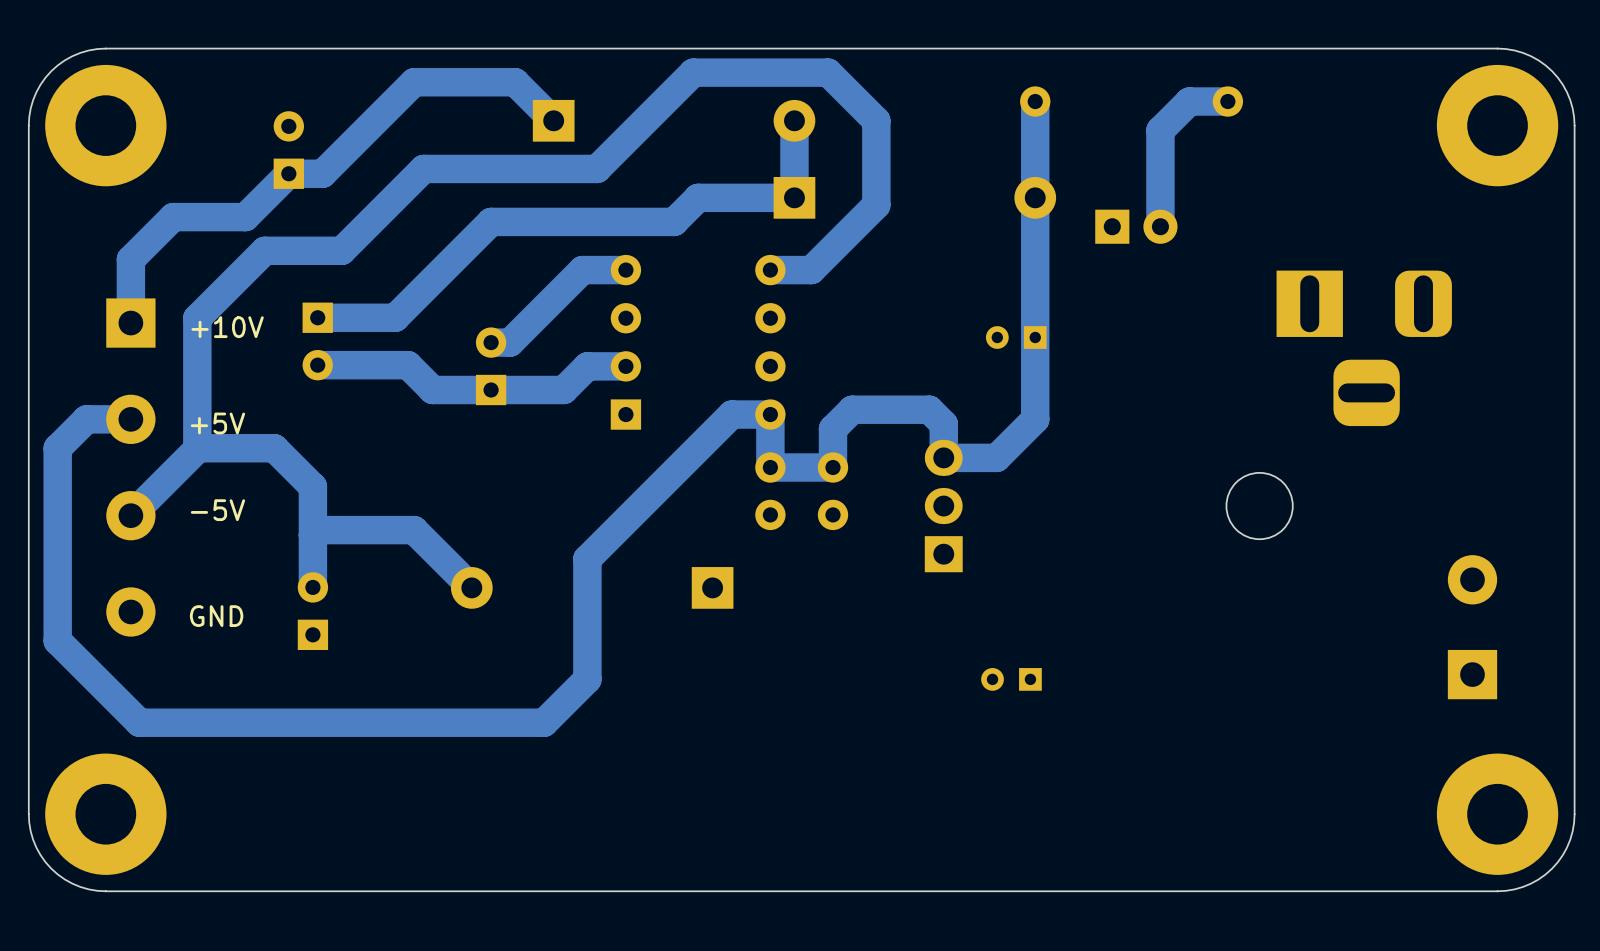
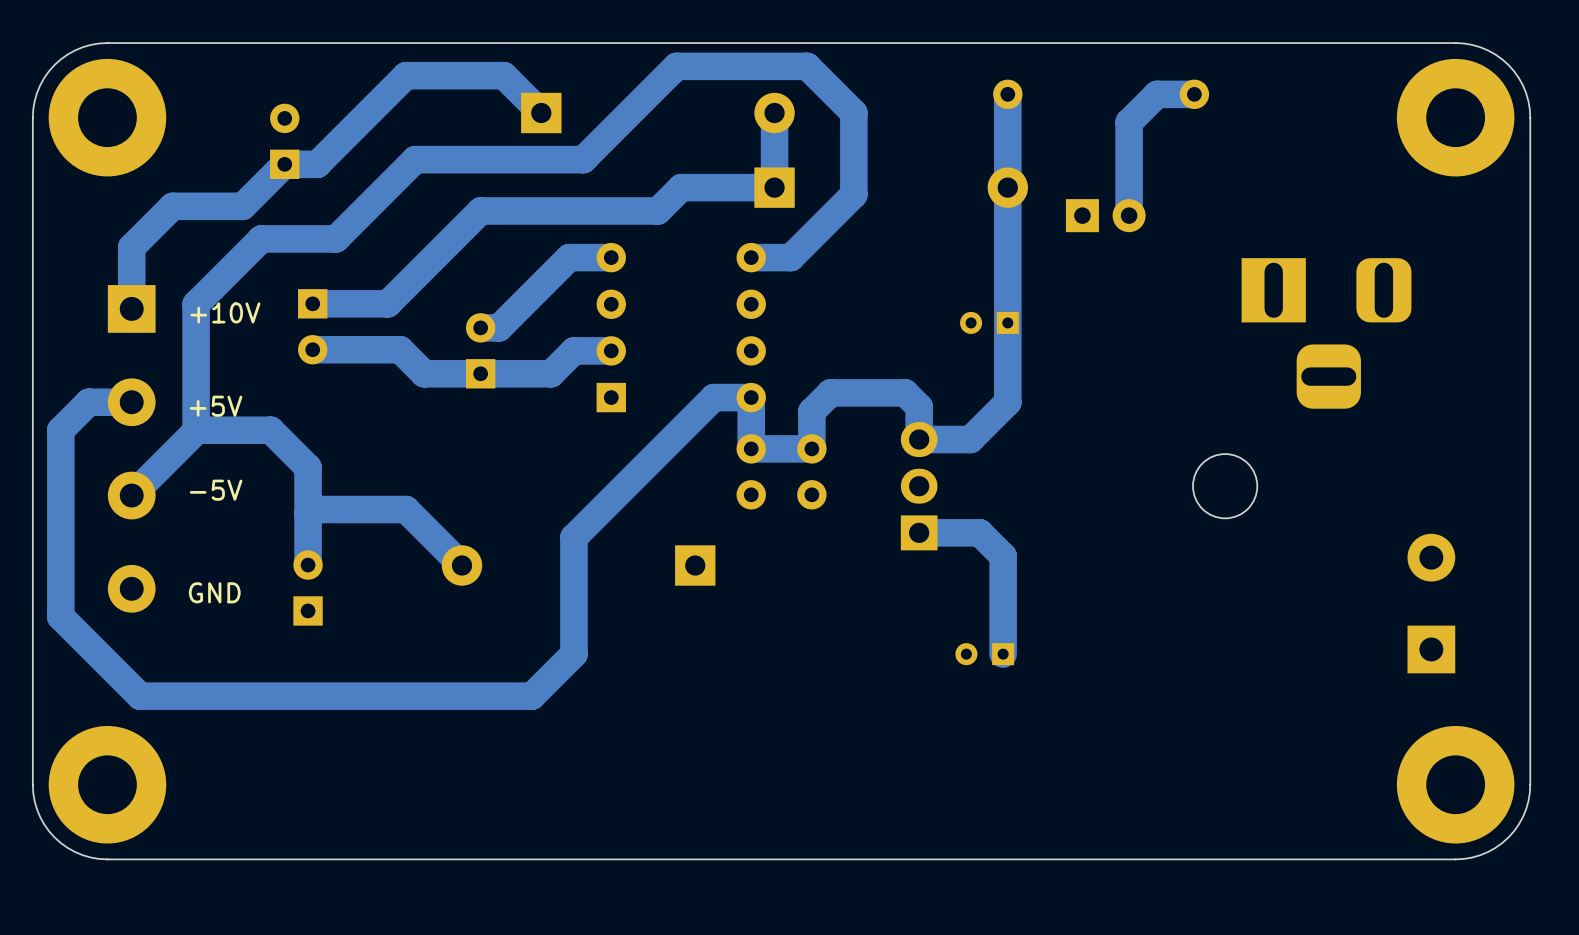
track: none -> (919, 532) (979, 532) (1003, 556) (1003, 654)

